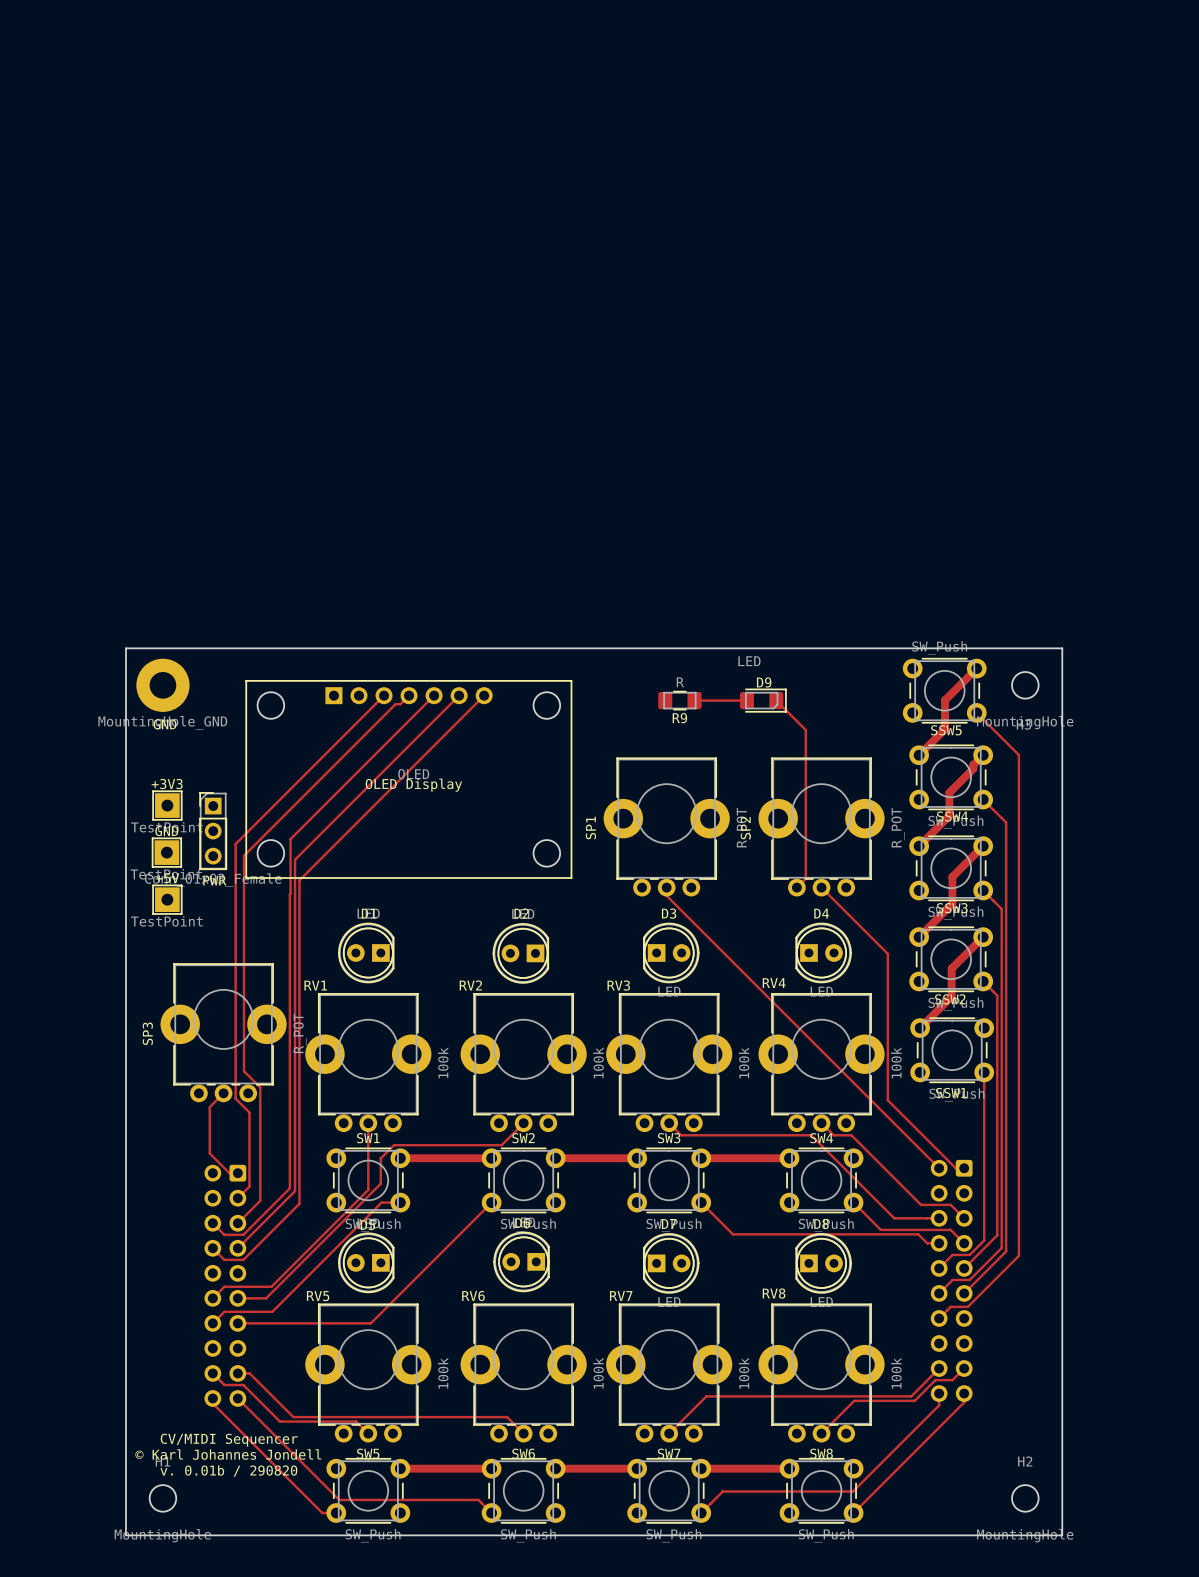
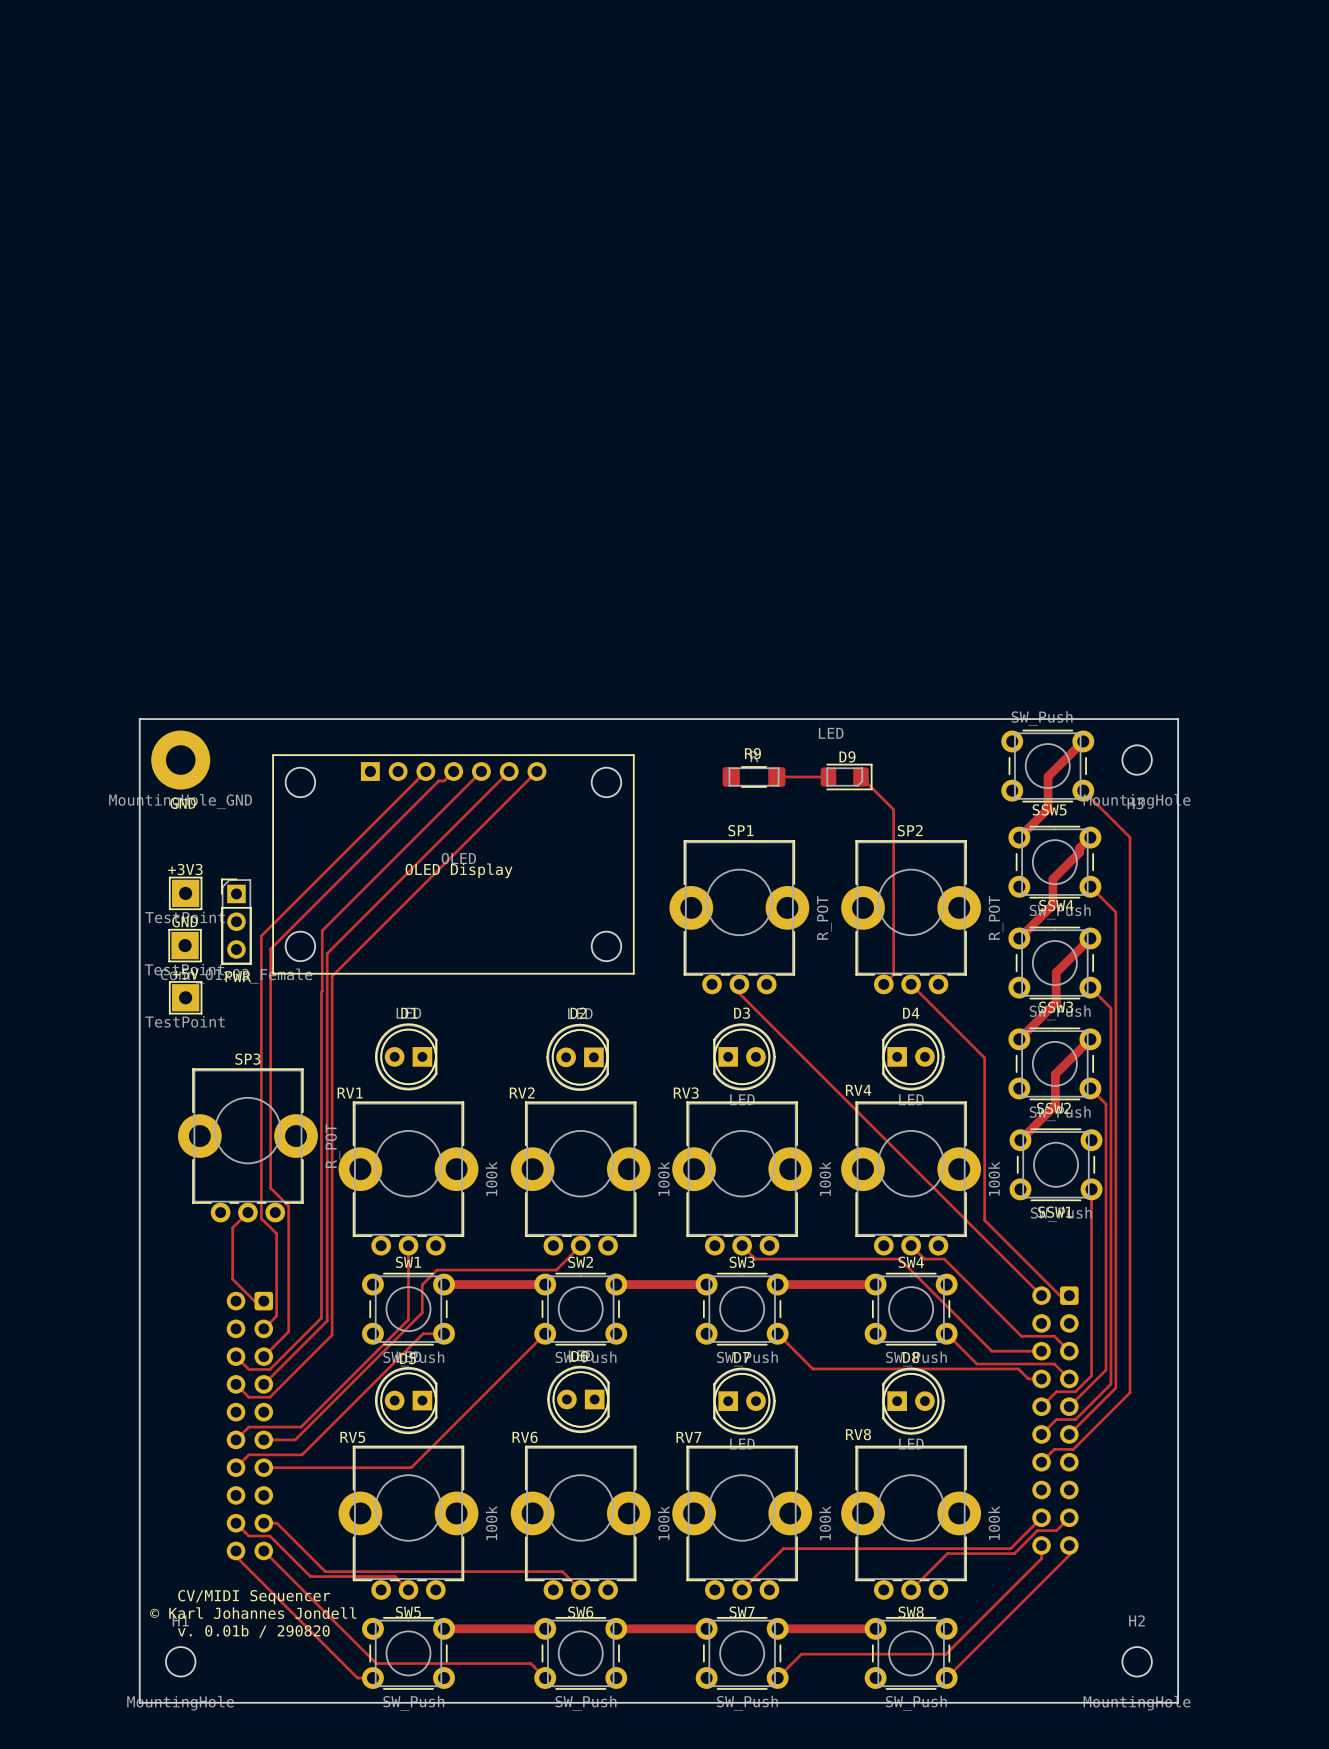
R9 footprint: [658, 691, 702, 711] -> [722, 766, 786, 788]
R9 name position: R9 (679, 718) -> R9 (752, 753)
SP1 name rotation: 0° (590, 827) -> 90° clockwise (740, 830)
SP1 name position: SP1 (590, 827) -> SP1 (740, 830)
SP2 name rotation: 0° (745, 828) -> 90° clockwise (910, 830)
SP2 name position: SP2 (745, 828) -> SP2 (910, 830)
SP3 name rotation: 0° (147, 1033) -> 90° clockwise (247, 1059)
SP3 name position: SP3 (147, 1033) -> SP3 (247, 1059)

